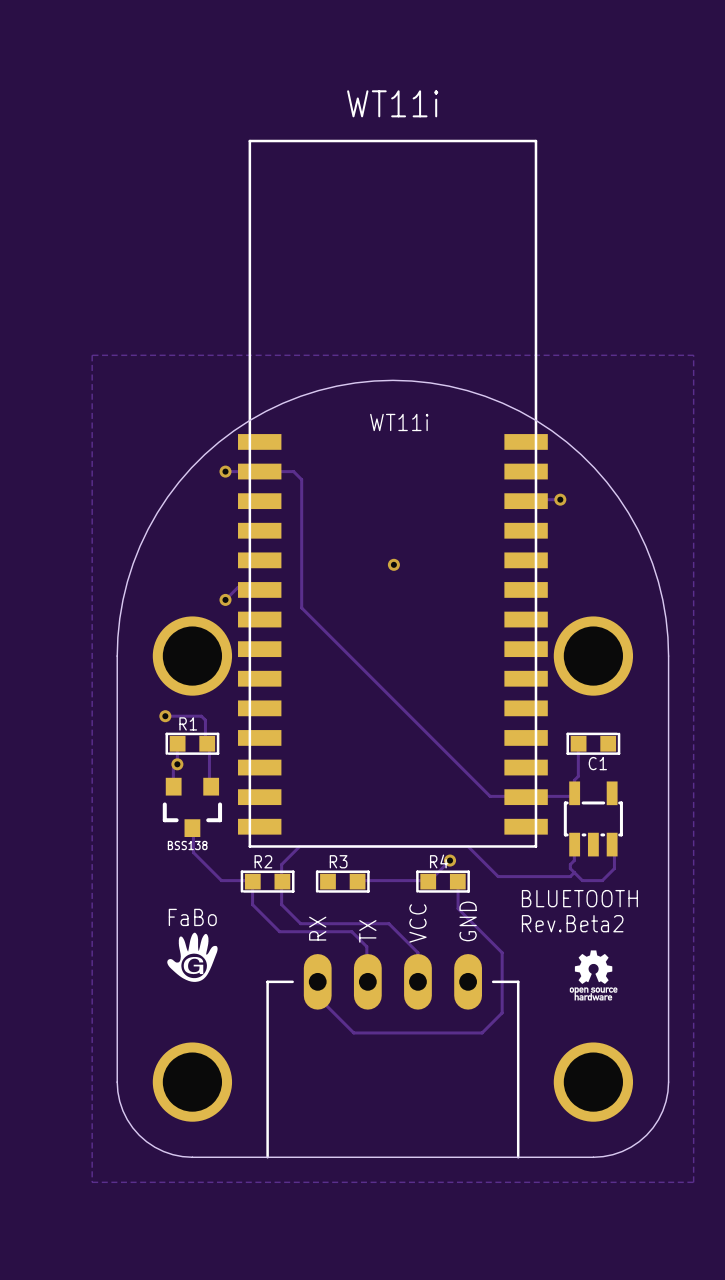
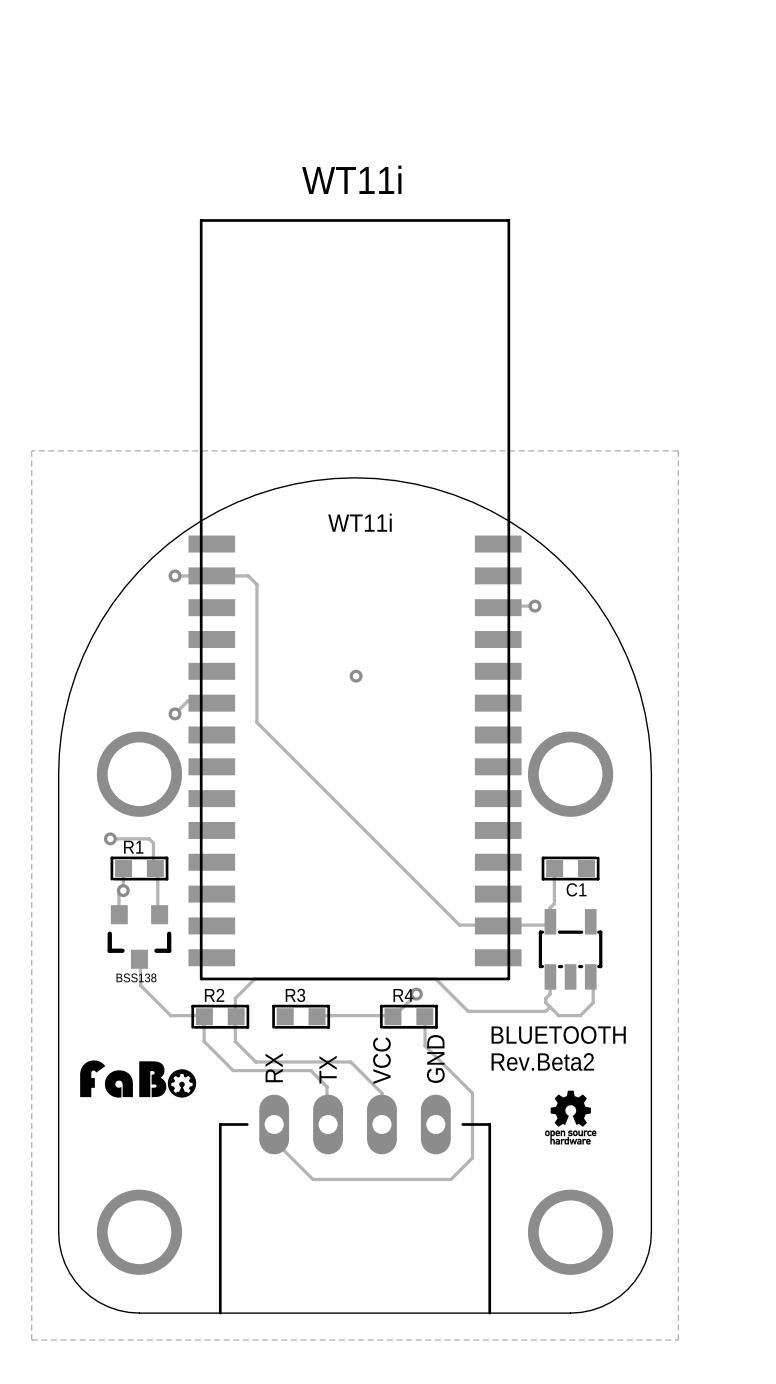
drawing shape: [167, 908, 218, 982] -> [80, 1060, 197, 1098]

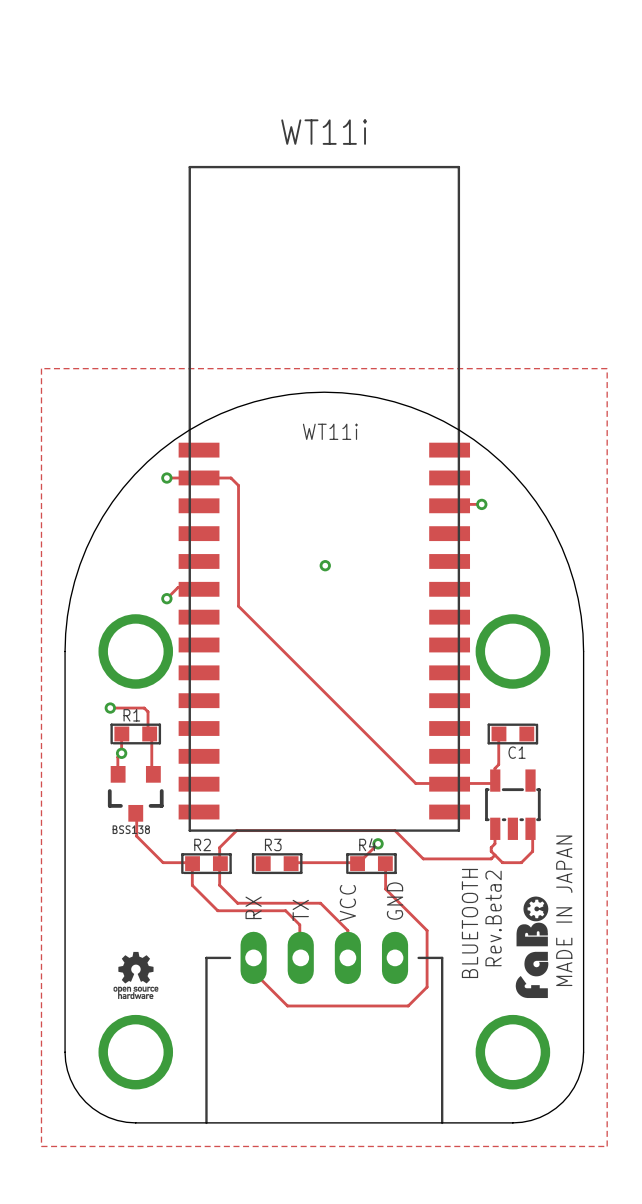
text rotation: 0° (558, 1035) -> 90° counterclockwise (469, 923)
drawing: none -> [515, 896, 549, 999]
drawing: [80, 1060, 197, 1098] -> none
text rotation: 0° (542, 1061) -> 90° counterclockwise (493, 918)
text: none -> MADE IN JAPAN (564, 910)
drawing position: (570, 1117) -> (135, 975)

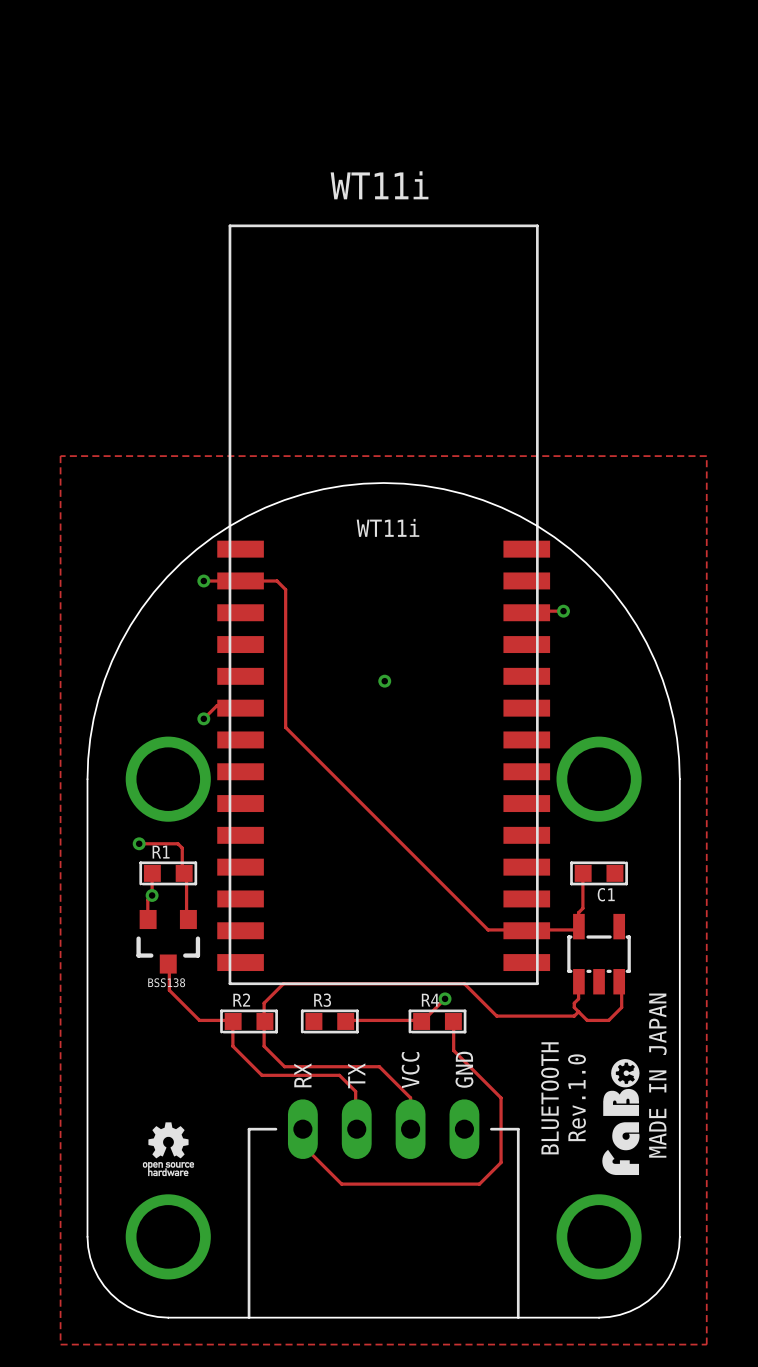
text: Rev.Beta2 (493, 918) -> Rev.1.0 (576, 1097)

